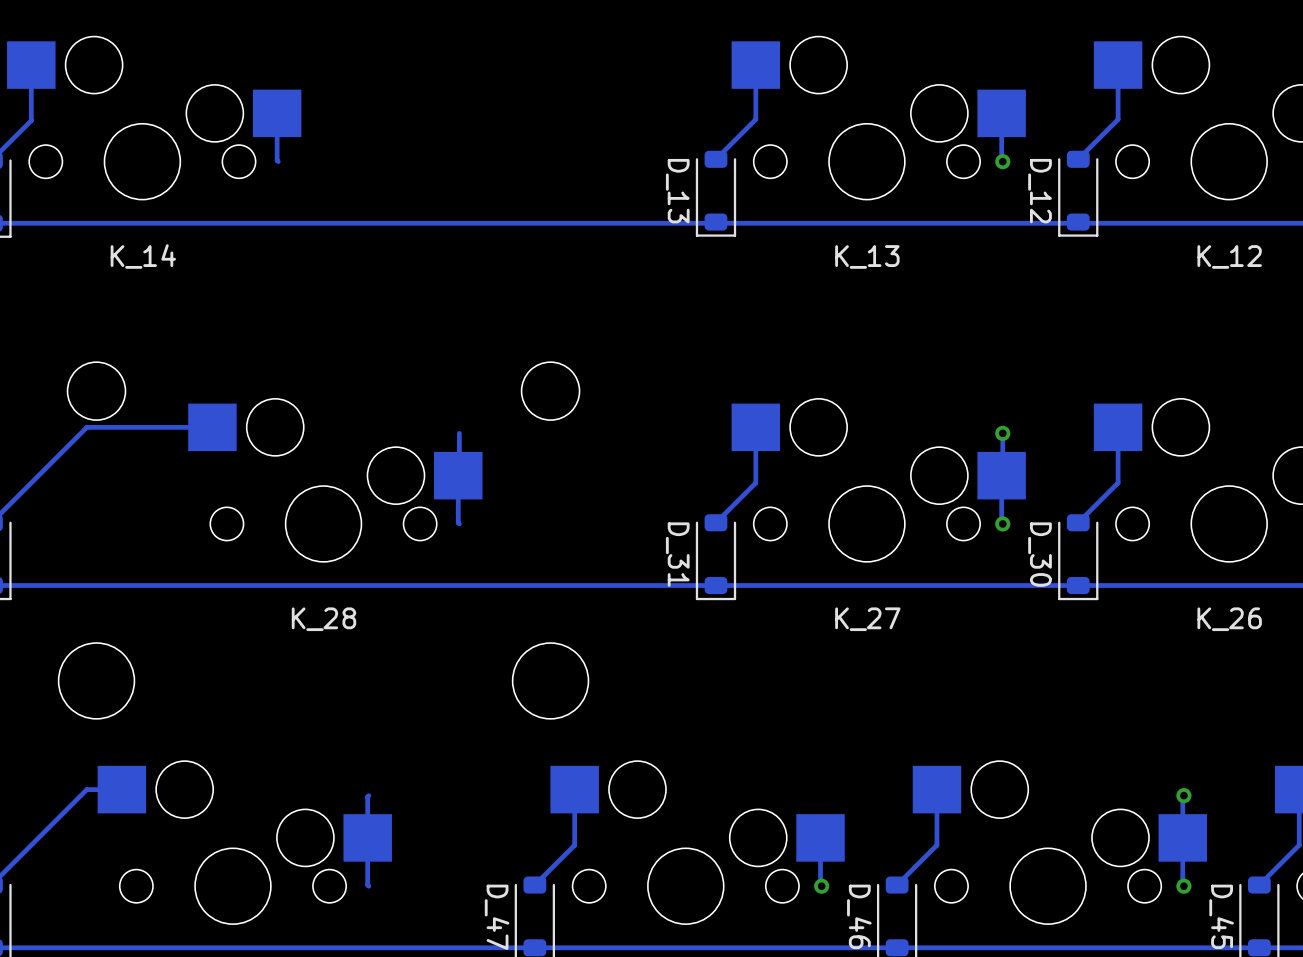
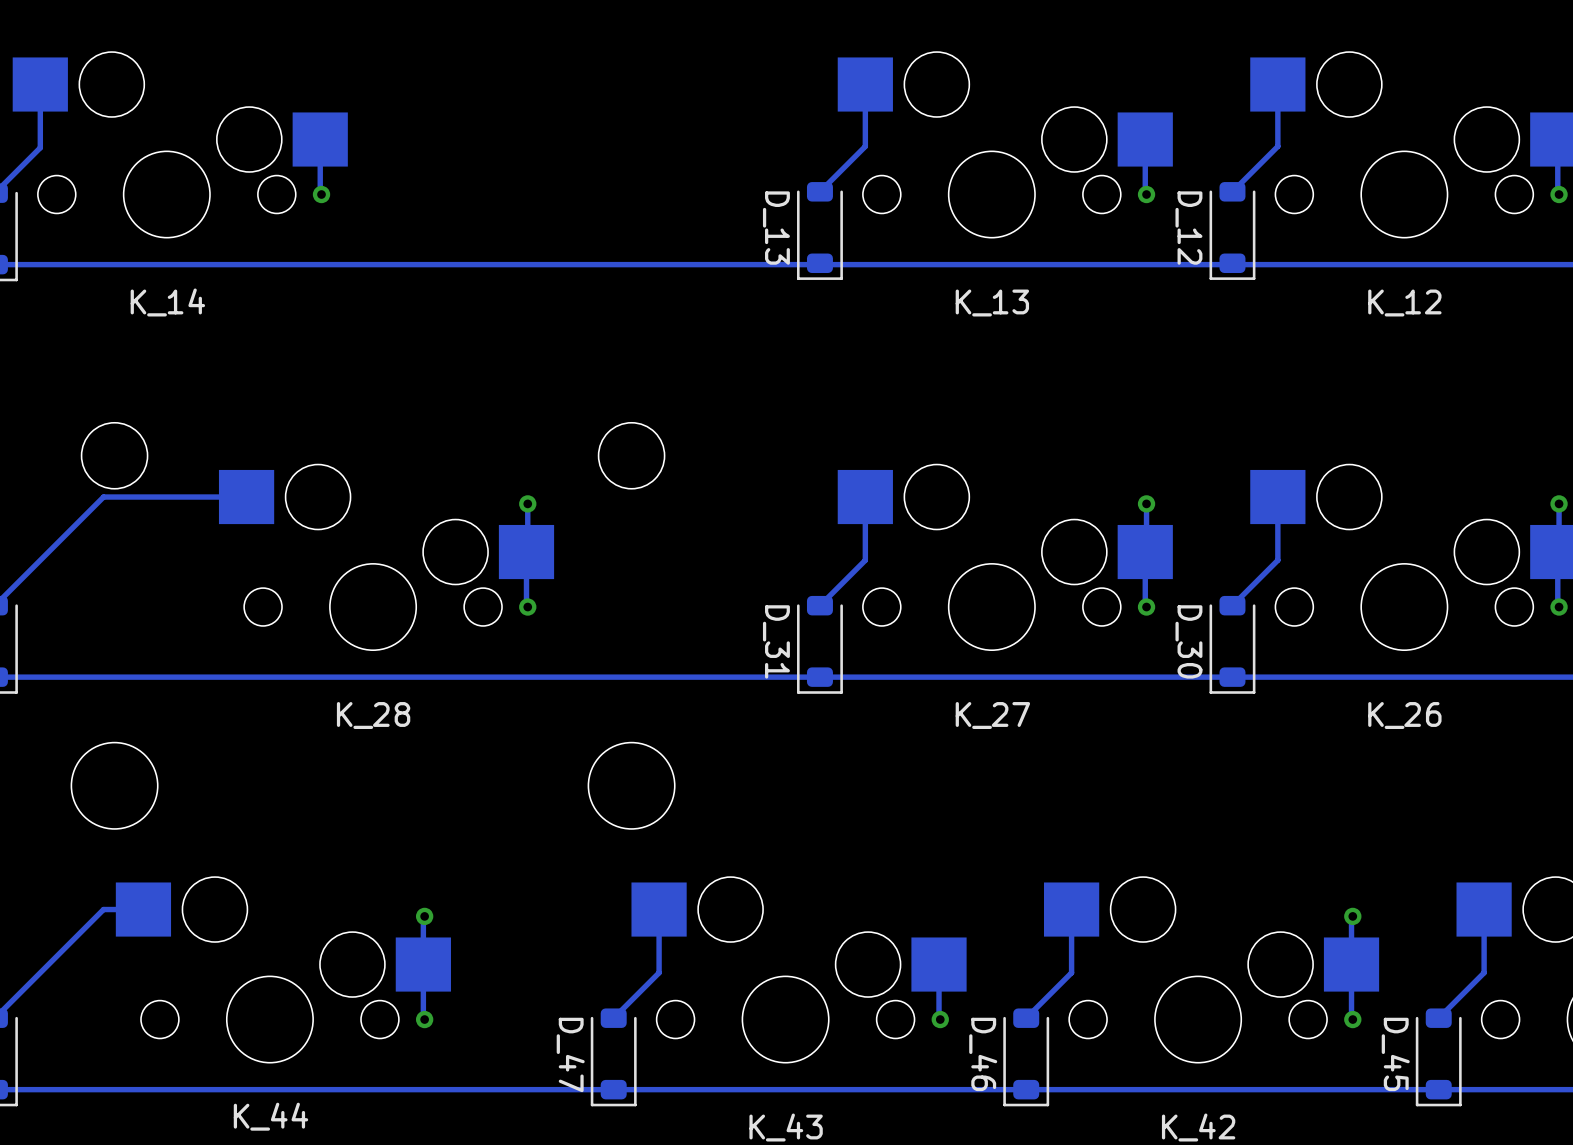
via: none -> (321, 194)
via: none -> (527, 503)
via: none -> (527, 607)
via: none -> (424, 916)
via: none -> (424, 1019)

